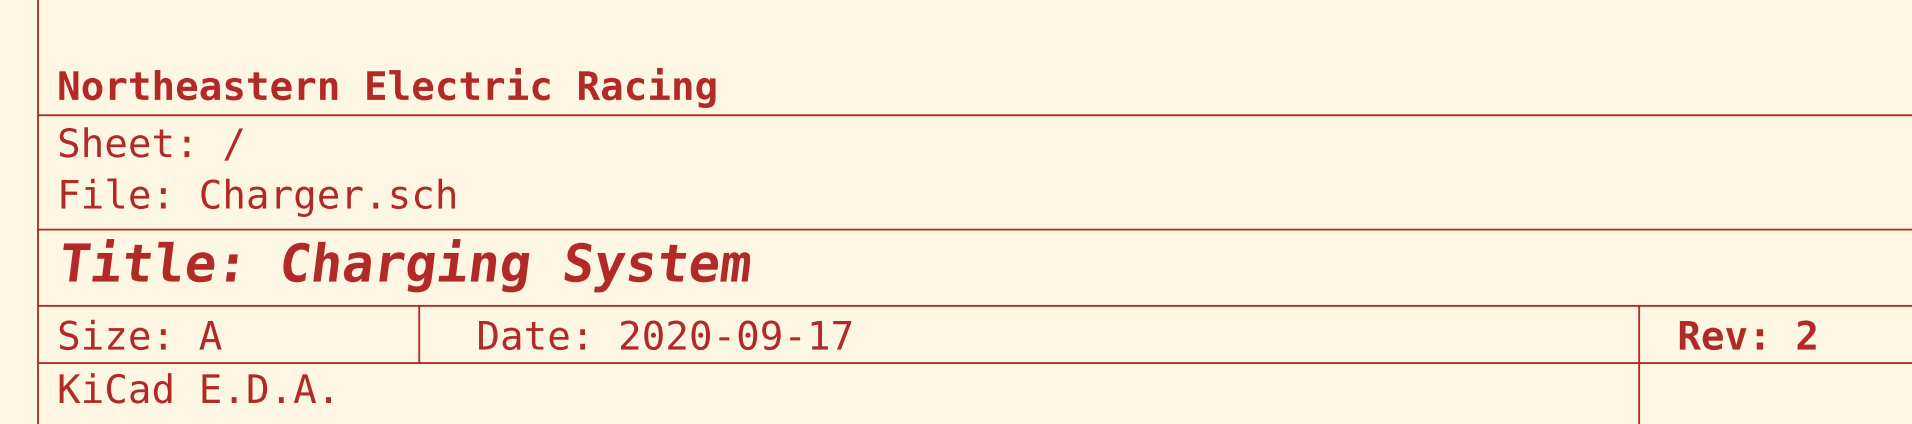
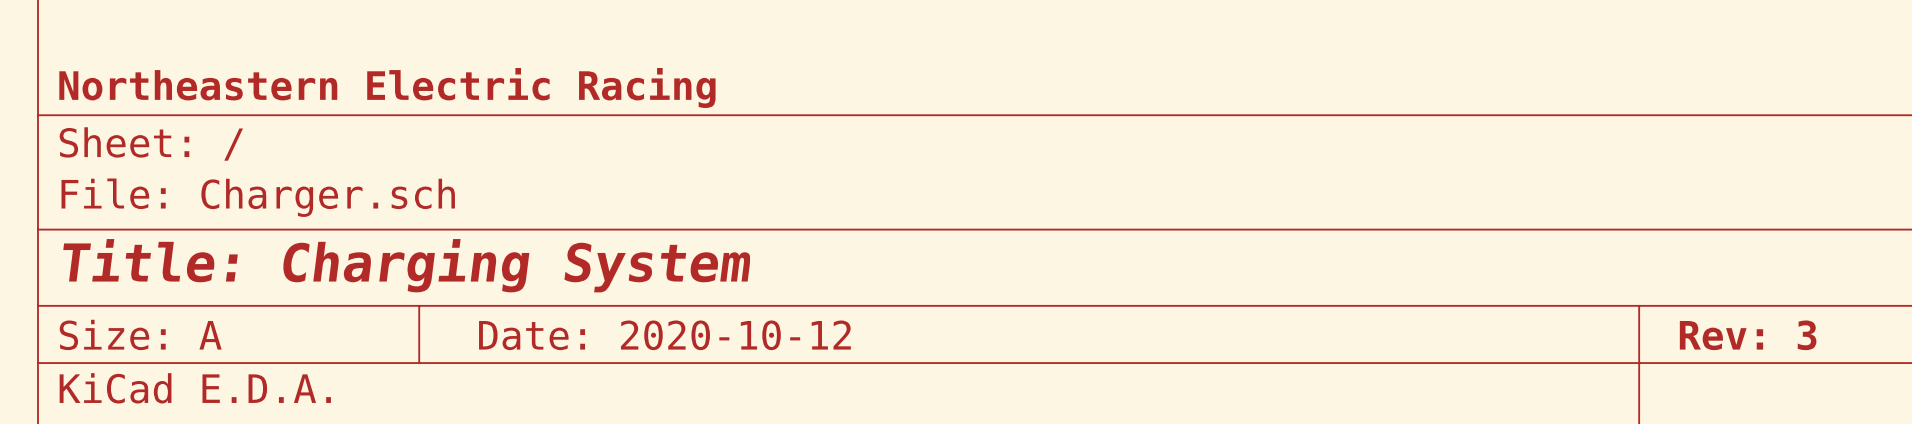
title block: Date: 2020-09-17 (665, 335) -> Date: 2020-10-12 (664, 335)
title block: Rev: 2 (1747, 335) -> Rev: 3 (1748, 335)

